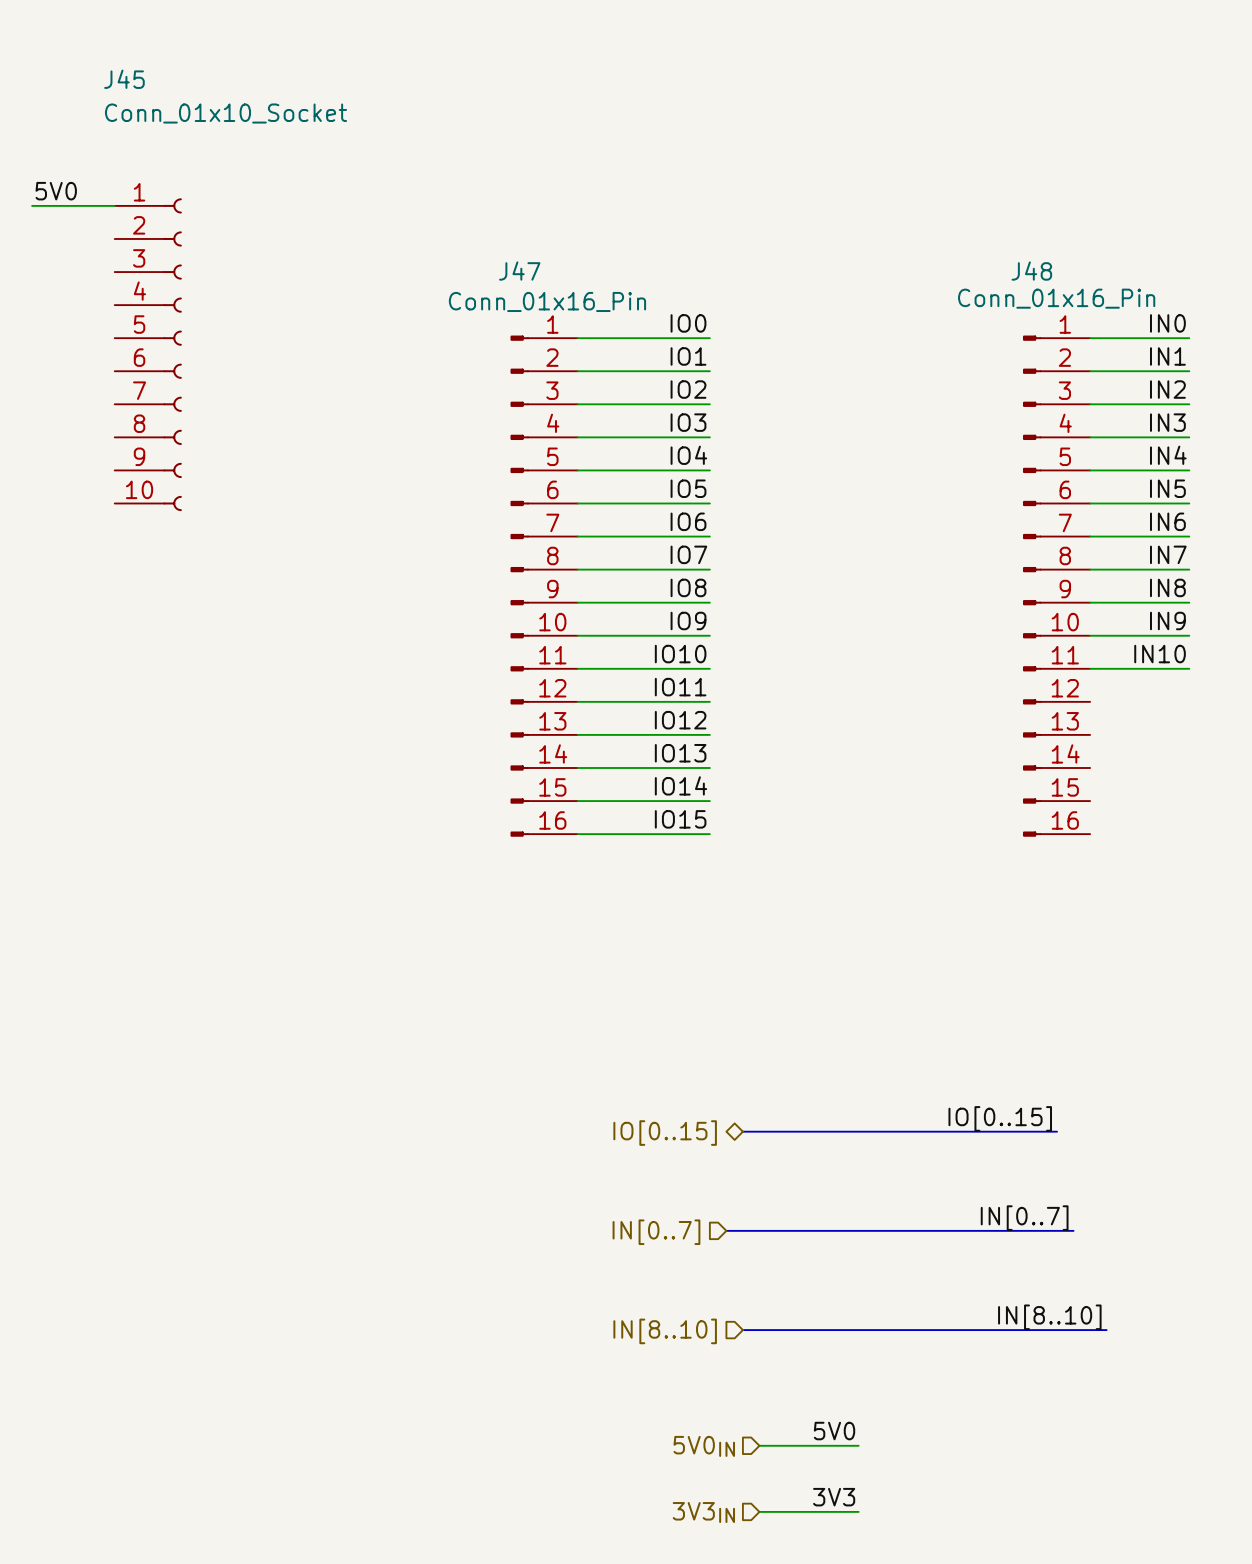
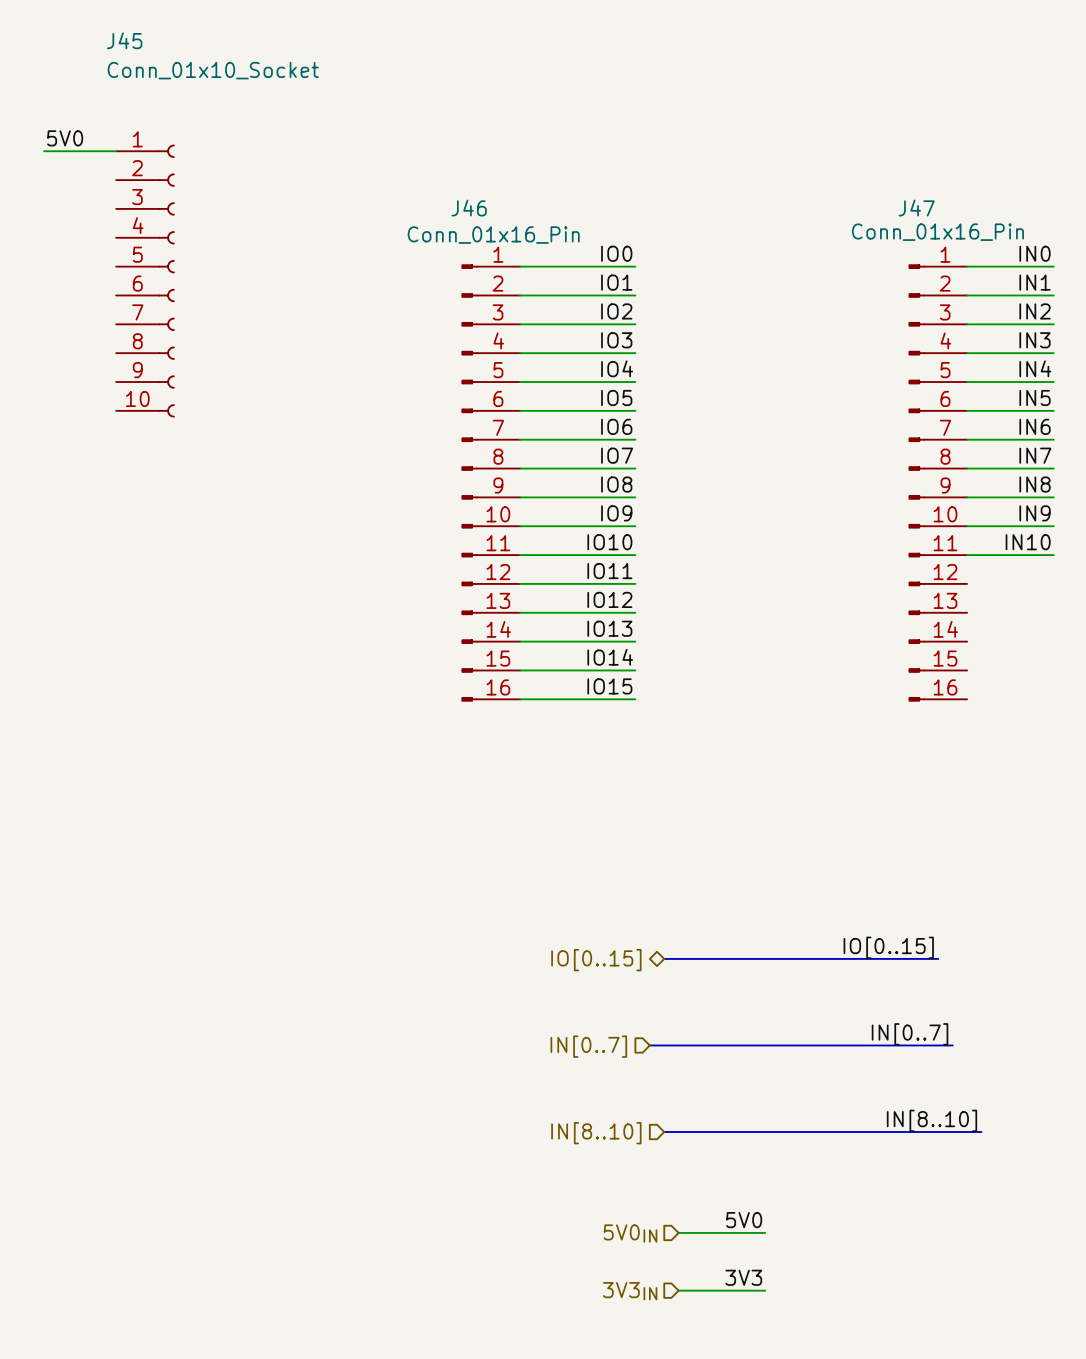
J47 name: J47 (519, 271) -> J46 (469, 208)
J48 name: J48 (1031, 271) -> J47 (916, 208)

